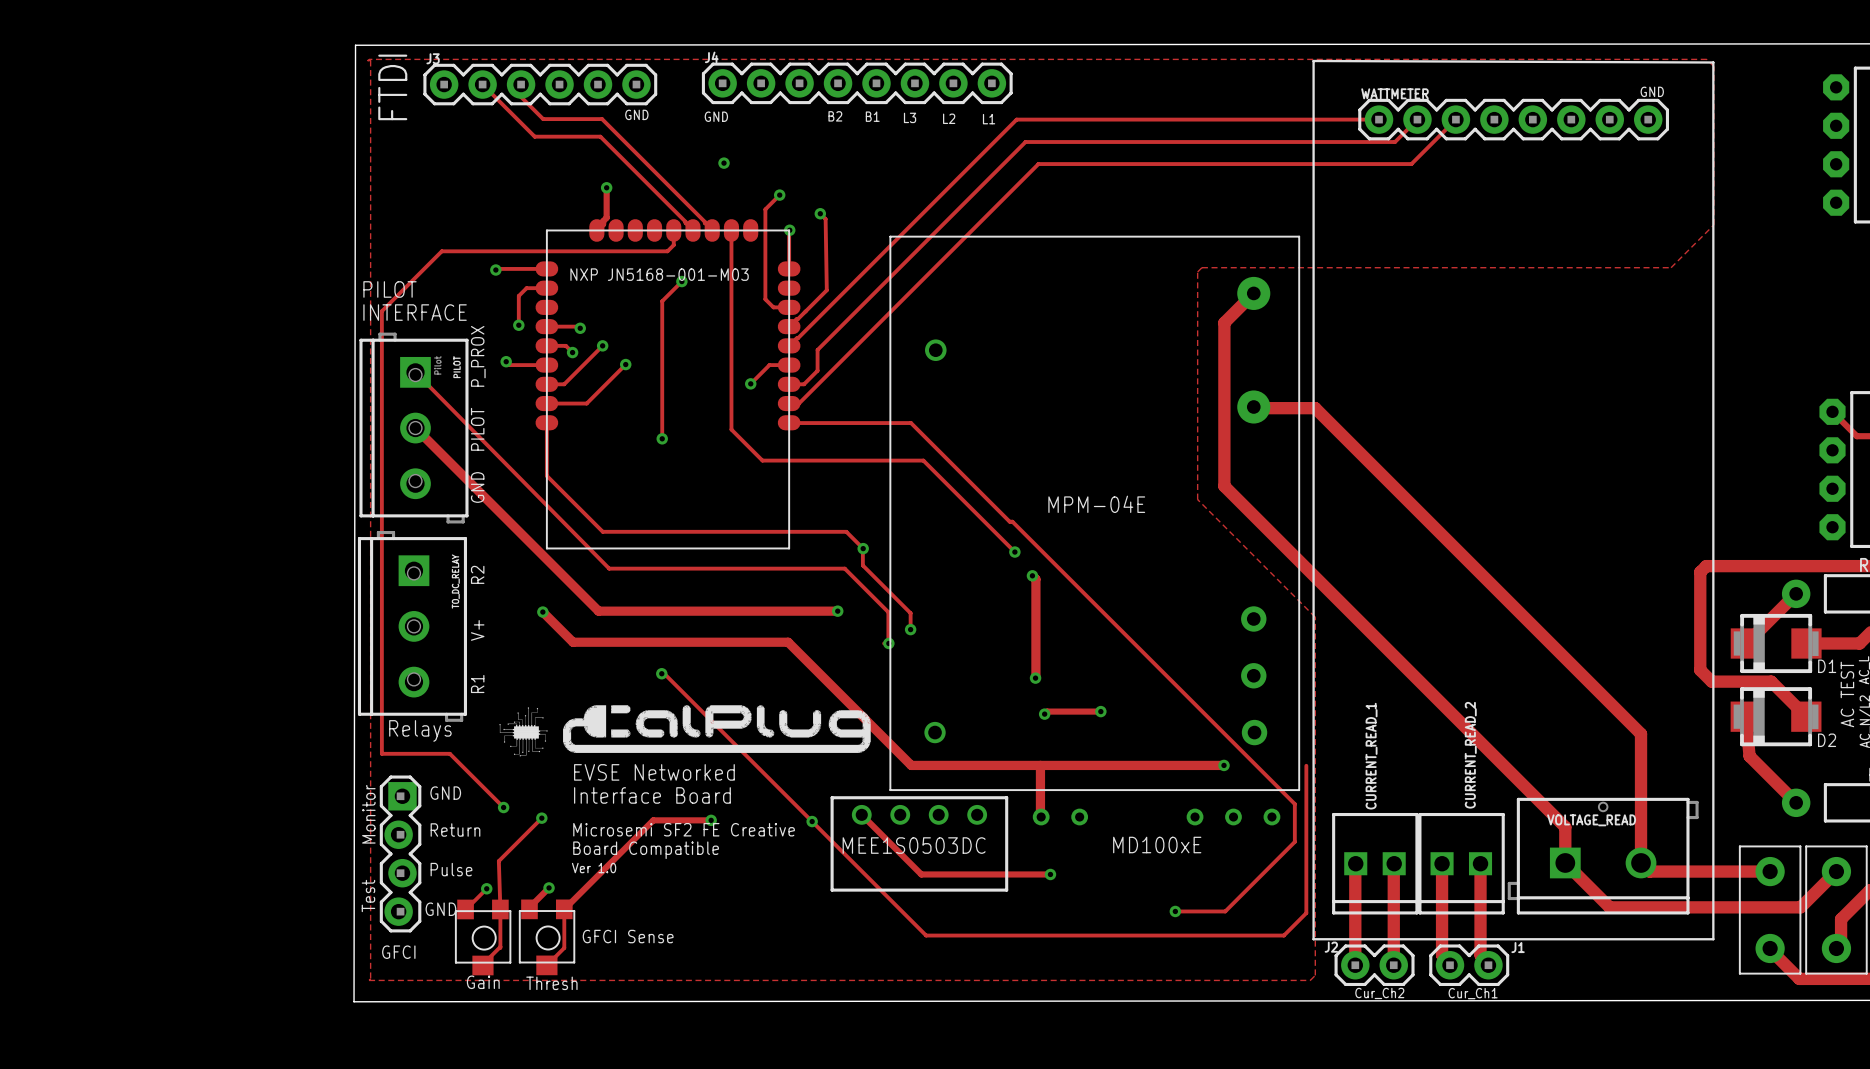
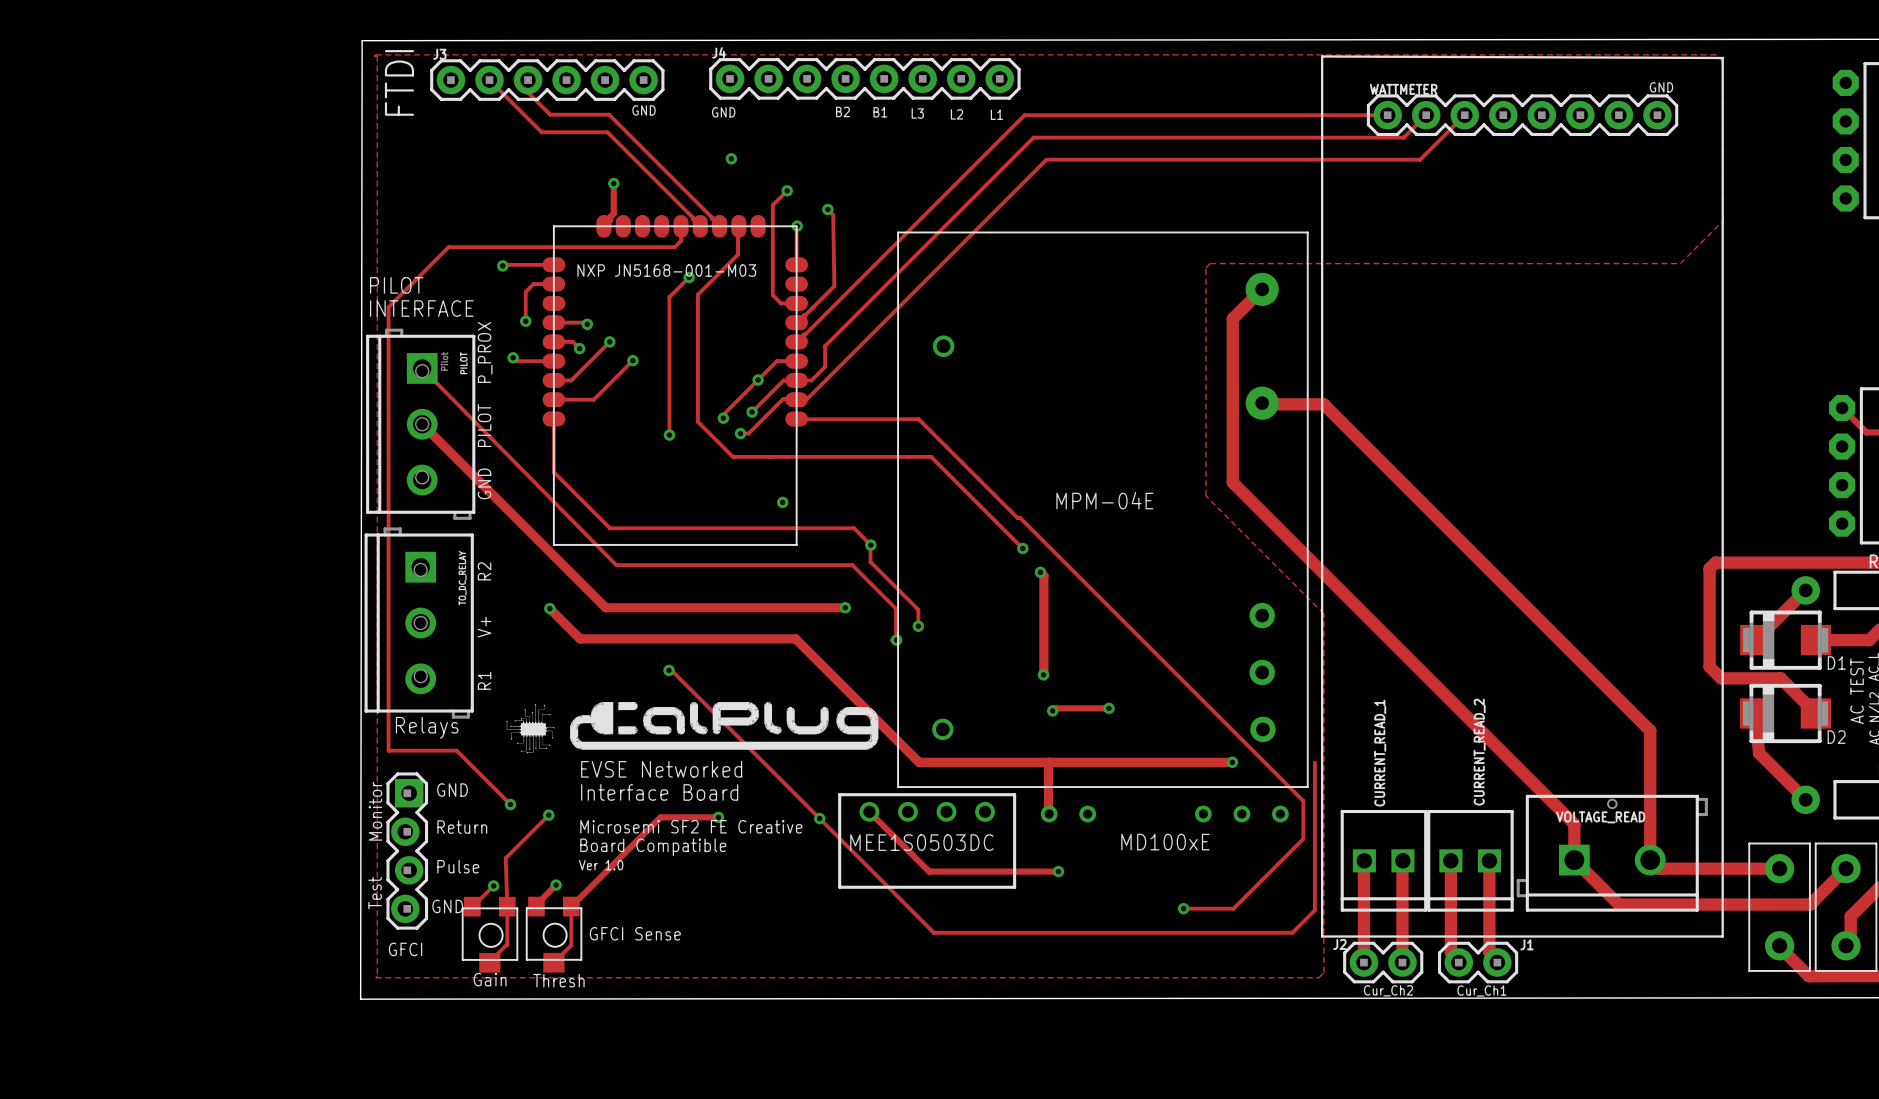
track: (731, 230) (731, 429) (762, 460) -> (738, 226) (737, 254) (697, 294) (697, 421) (732, 456) (769, 456)
track: none -> (758, 379) (723, 414) (723, 418)
track: none -> (796, 380) (783, 380) (752, 412)
track: none -> (796, 399) (783, 398) (748, 433) (740, 433)
via: none -> (752, 412)
via: none -> (723, 418)
via: none -> (740, 433)
via: none -> (782, 502)

